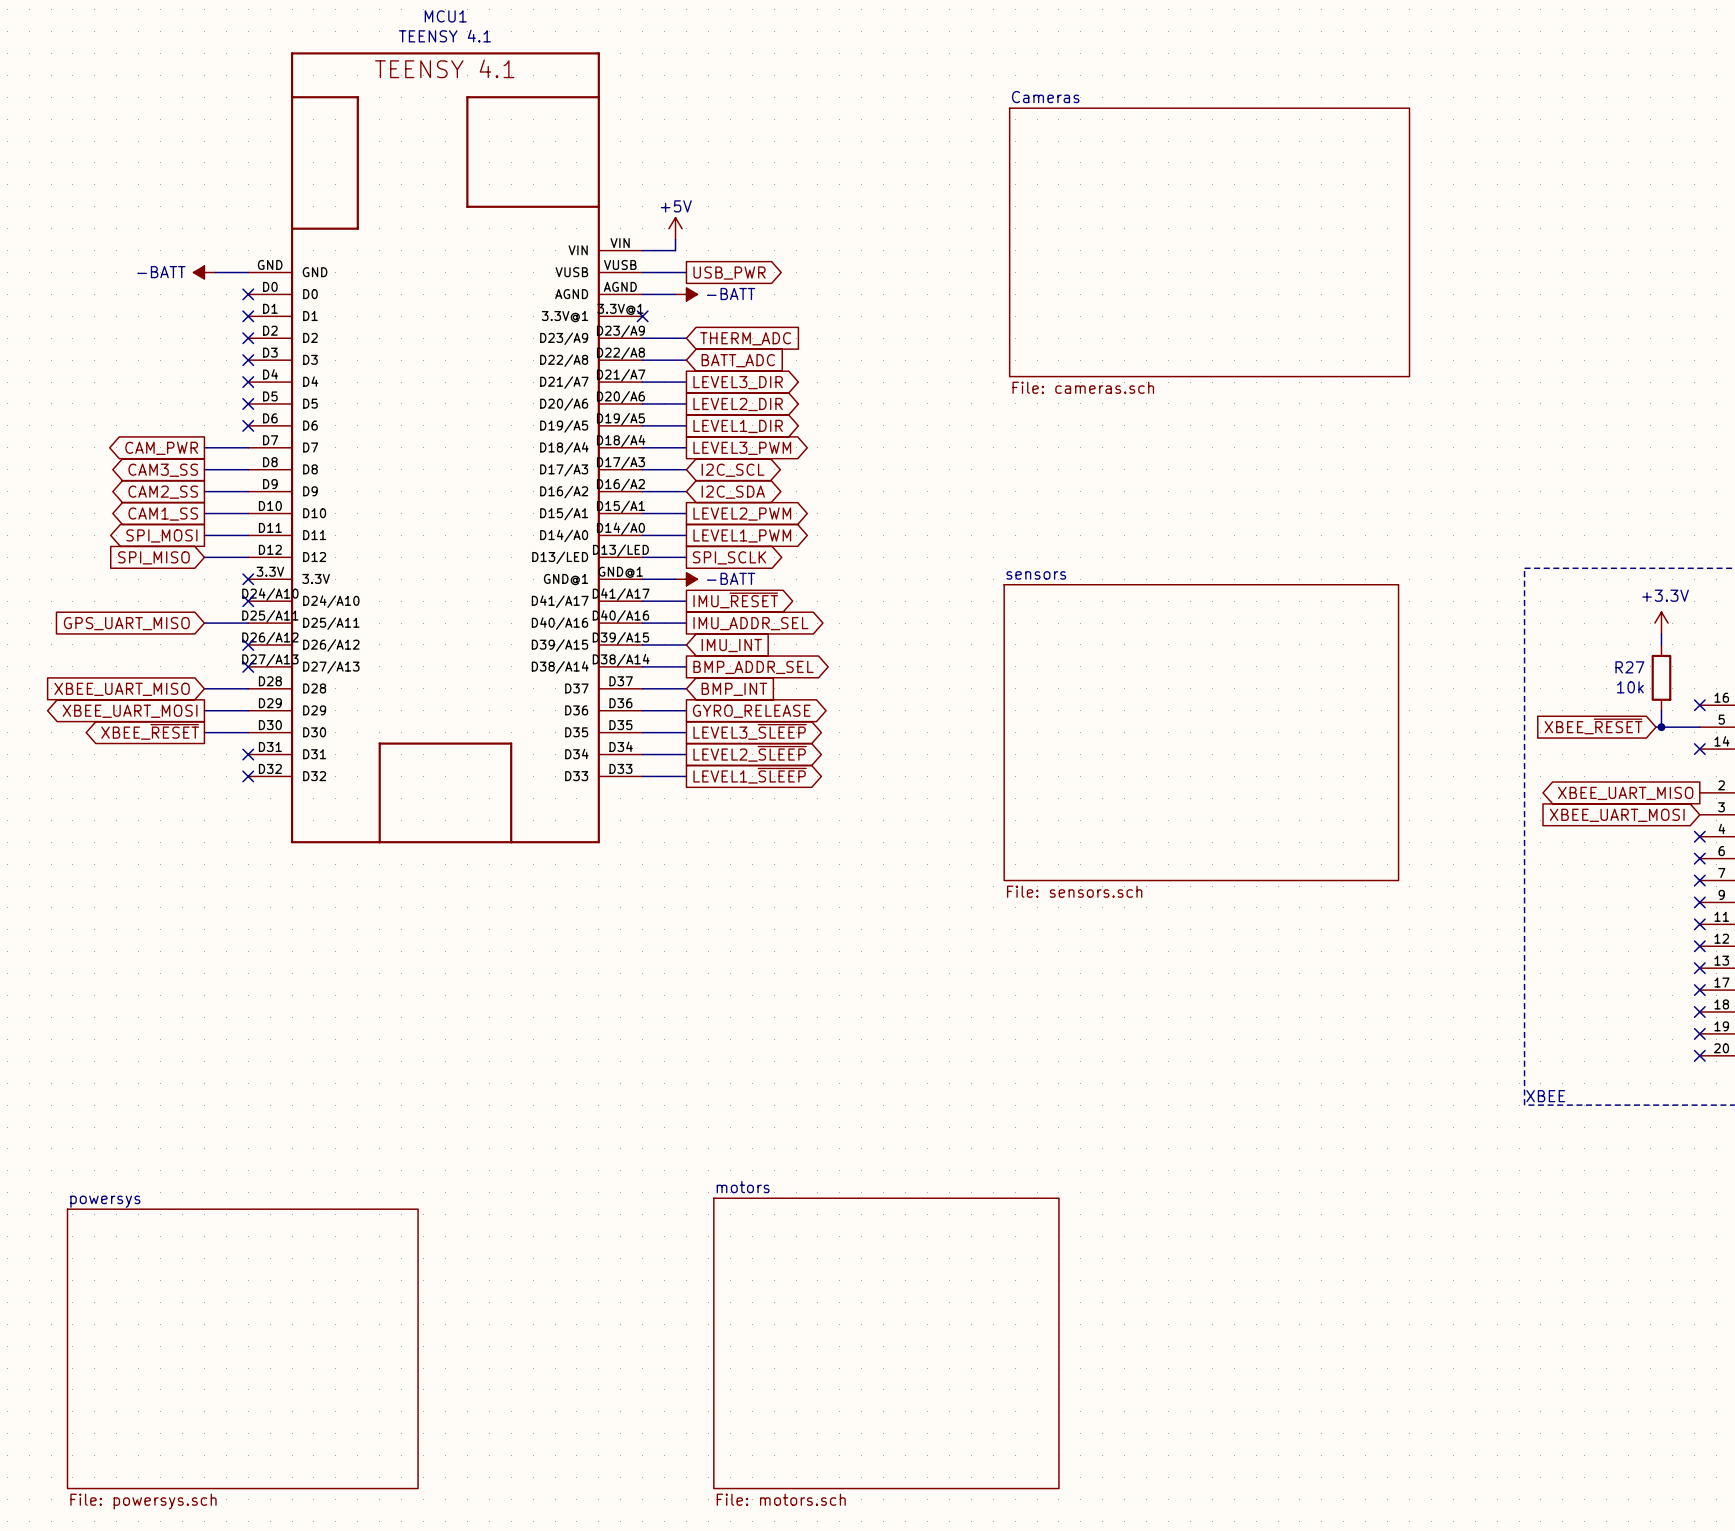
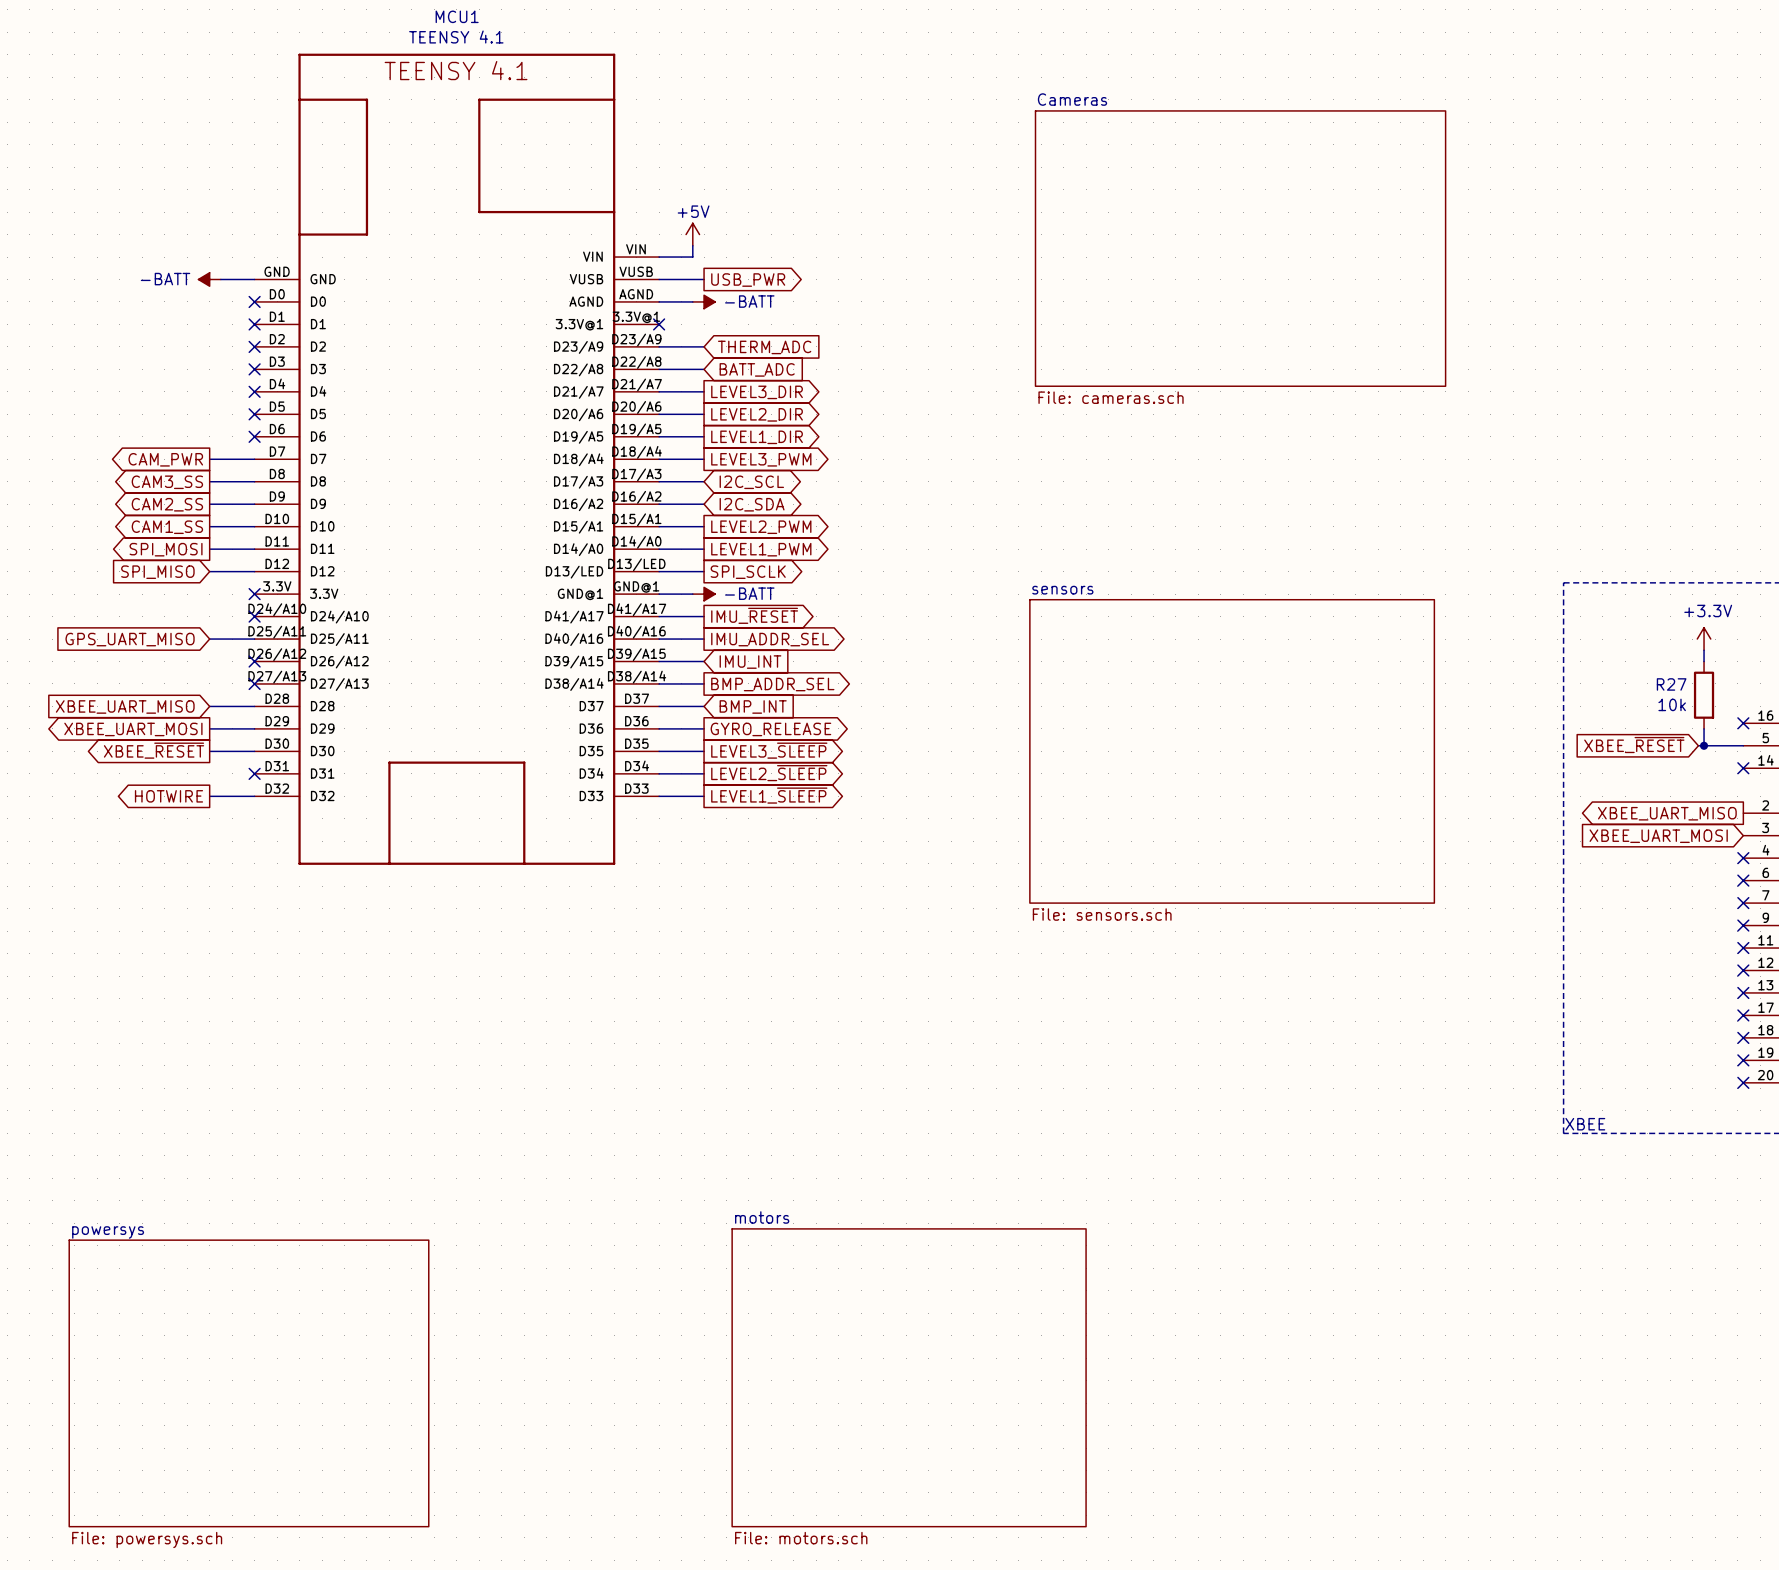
global label: none -> HOTWIRE (168, 796)
wire: none -> (209, 796) (254, 796)
no-connect mark: (248, 776) -> none

